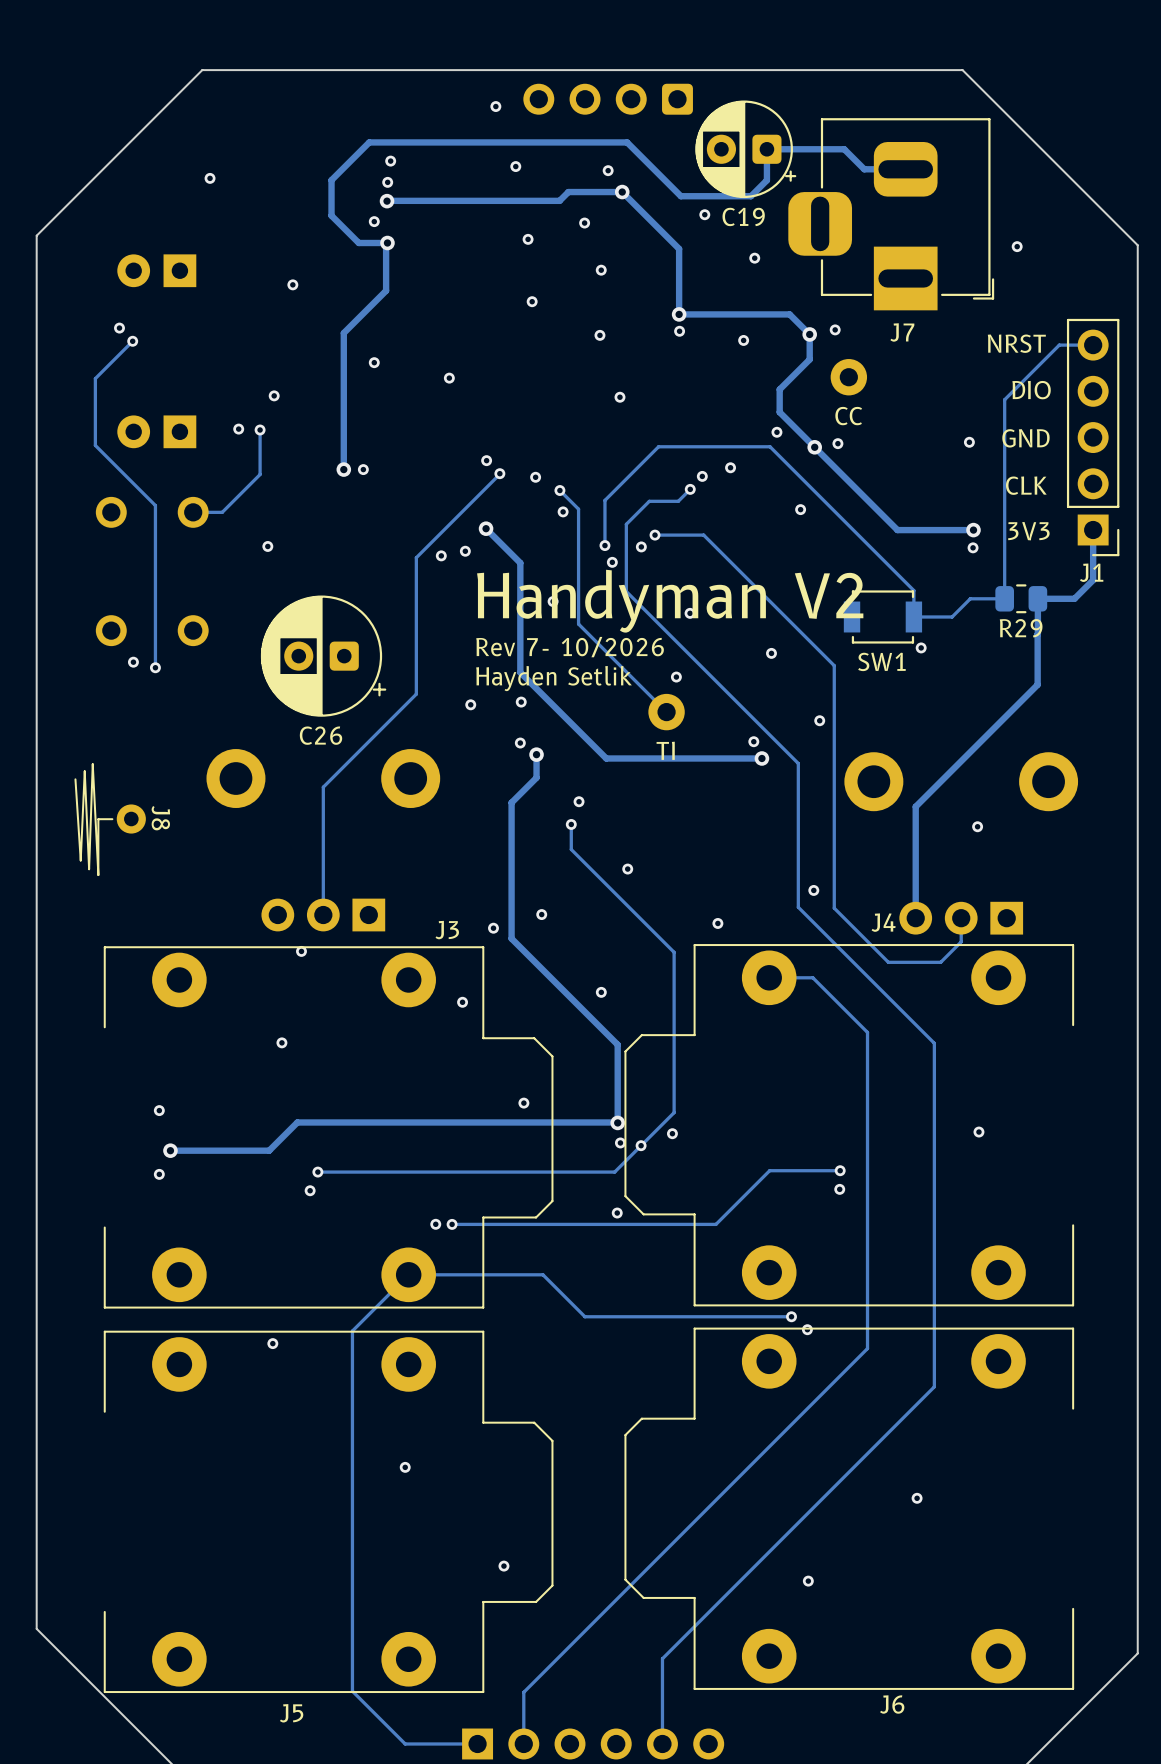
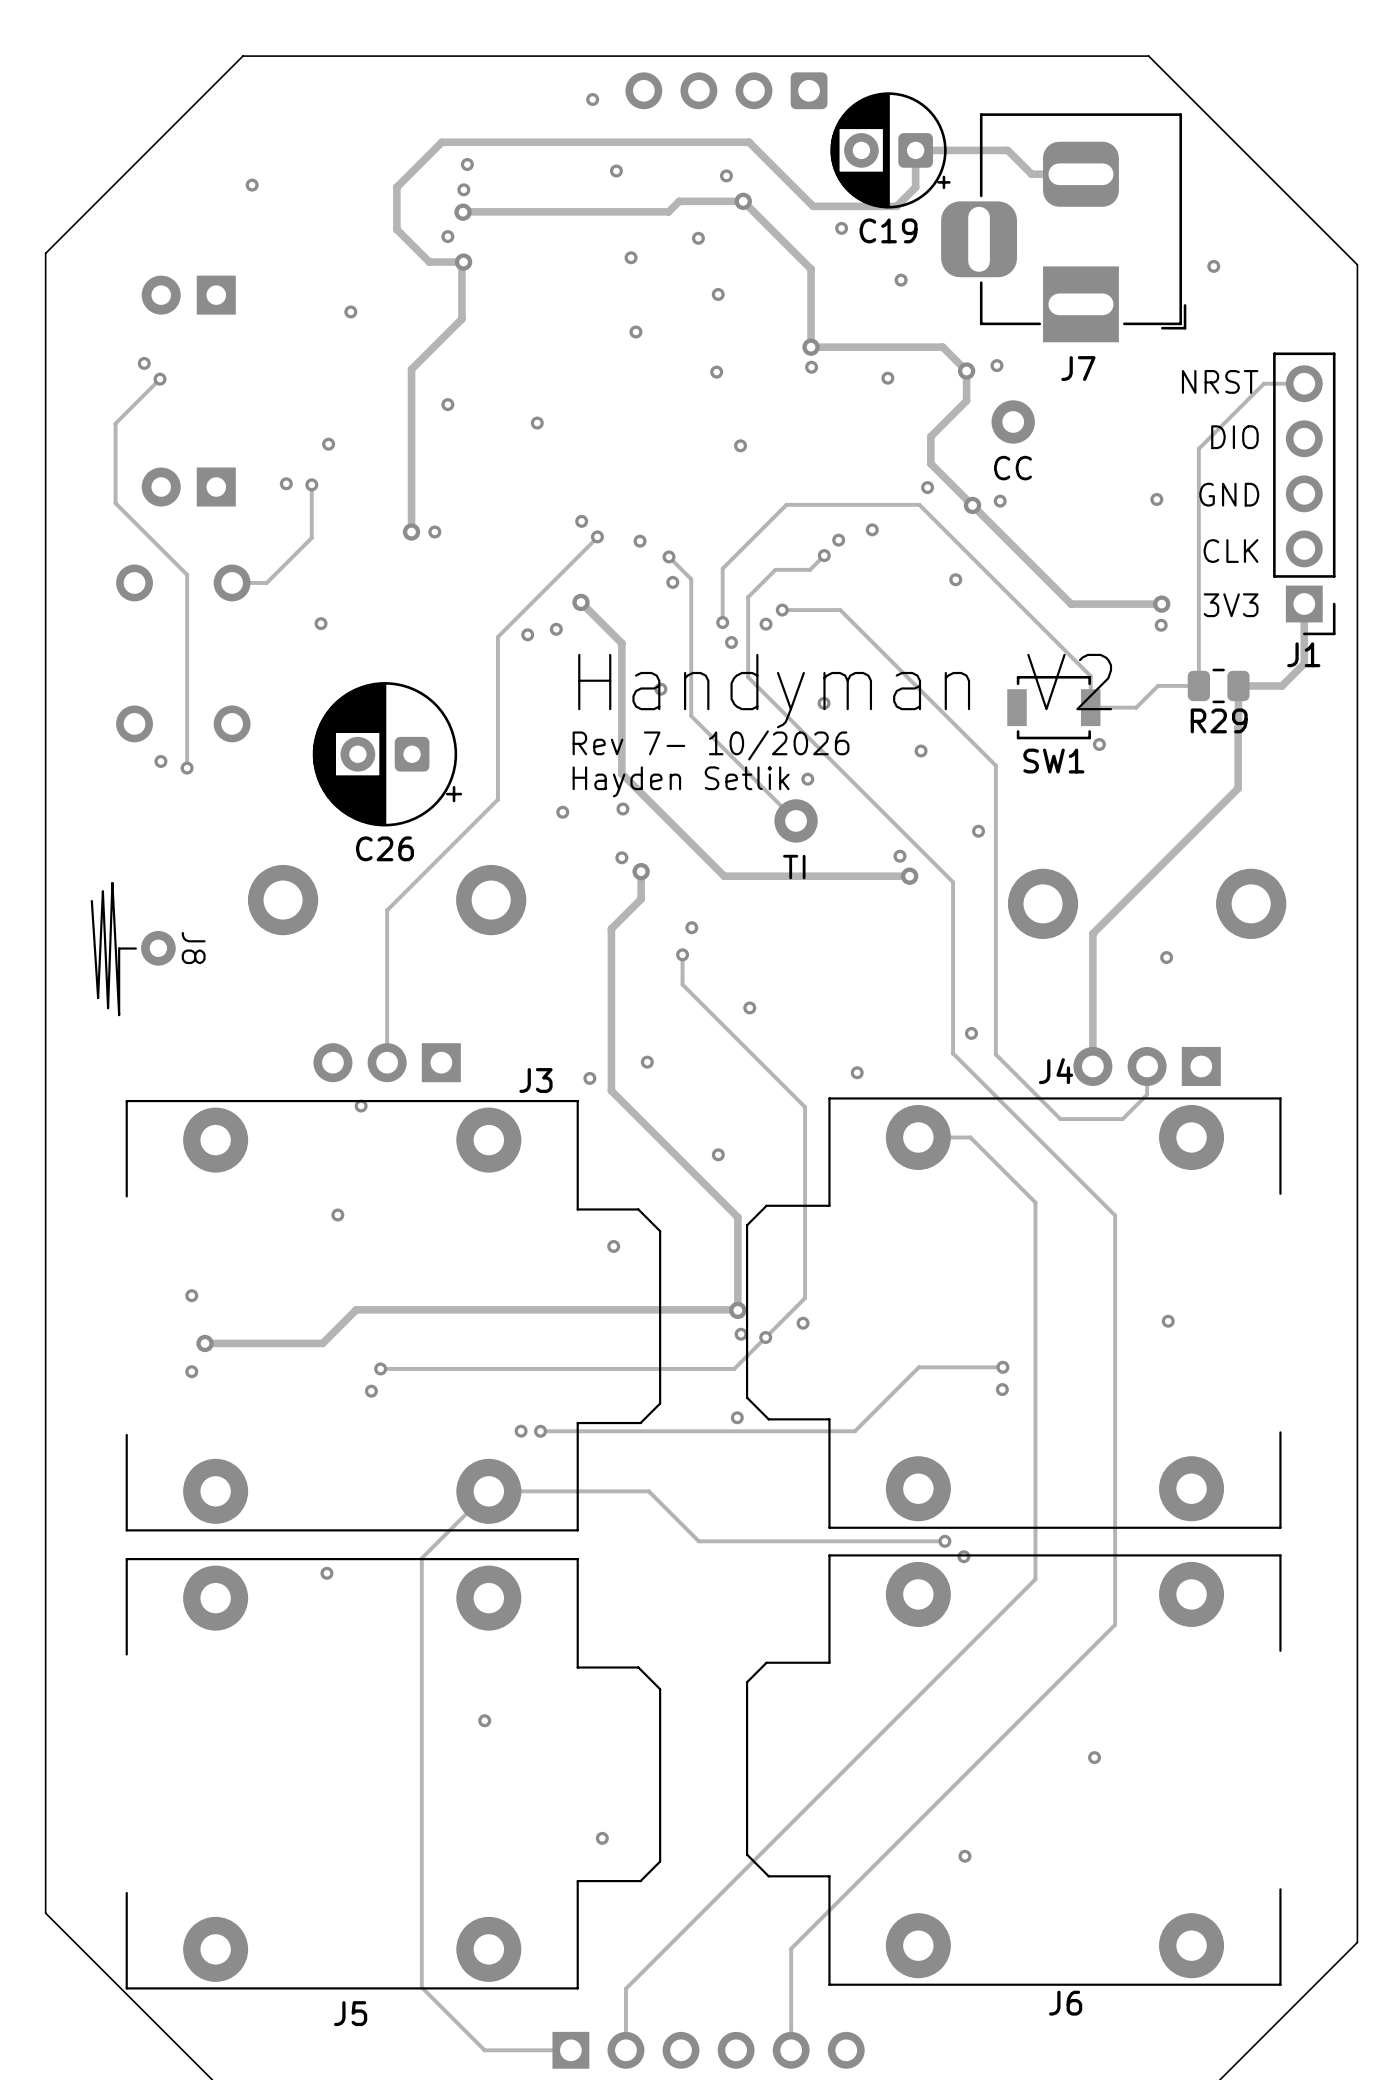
via: (462, 1002) -> none
via position: (523, 1103) -> (613, 1246)

